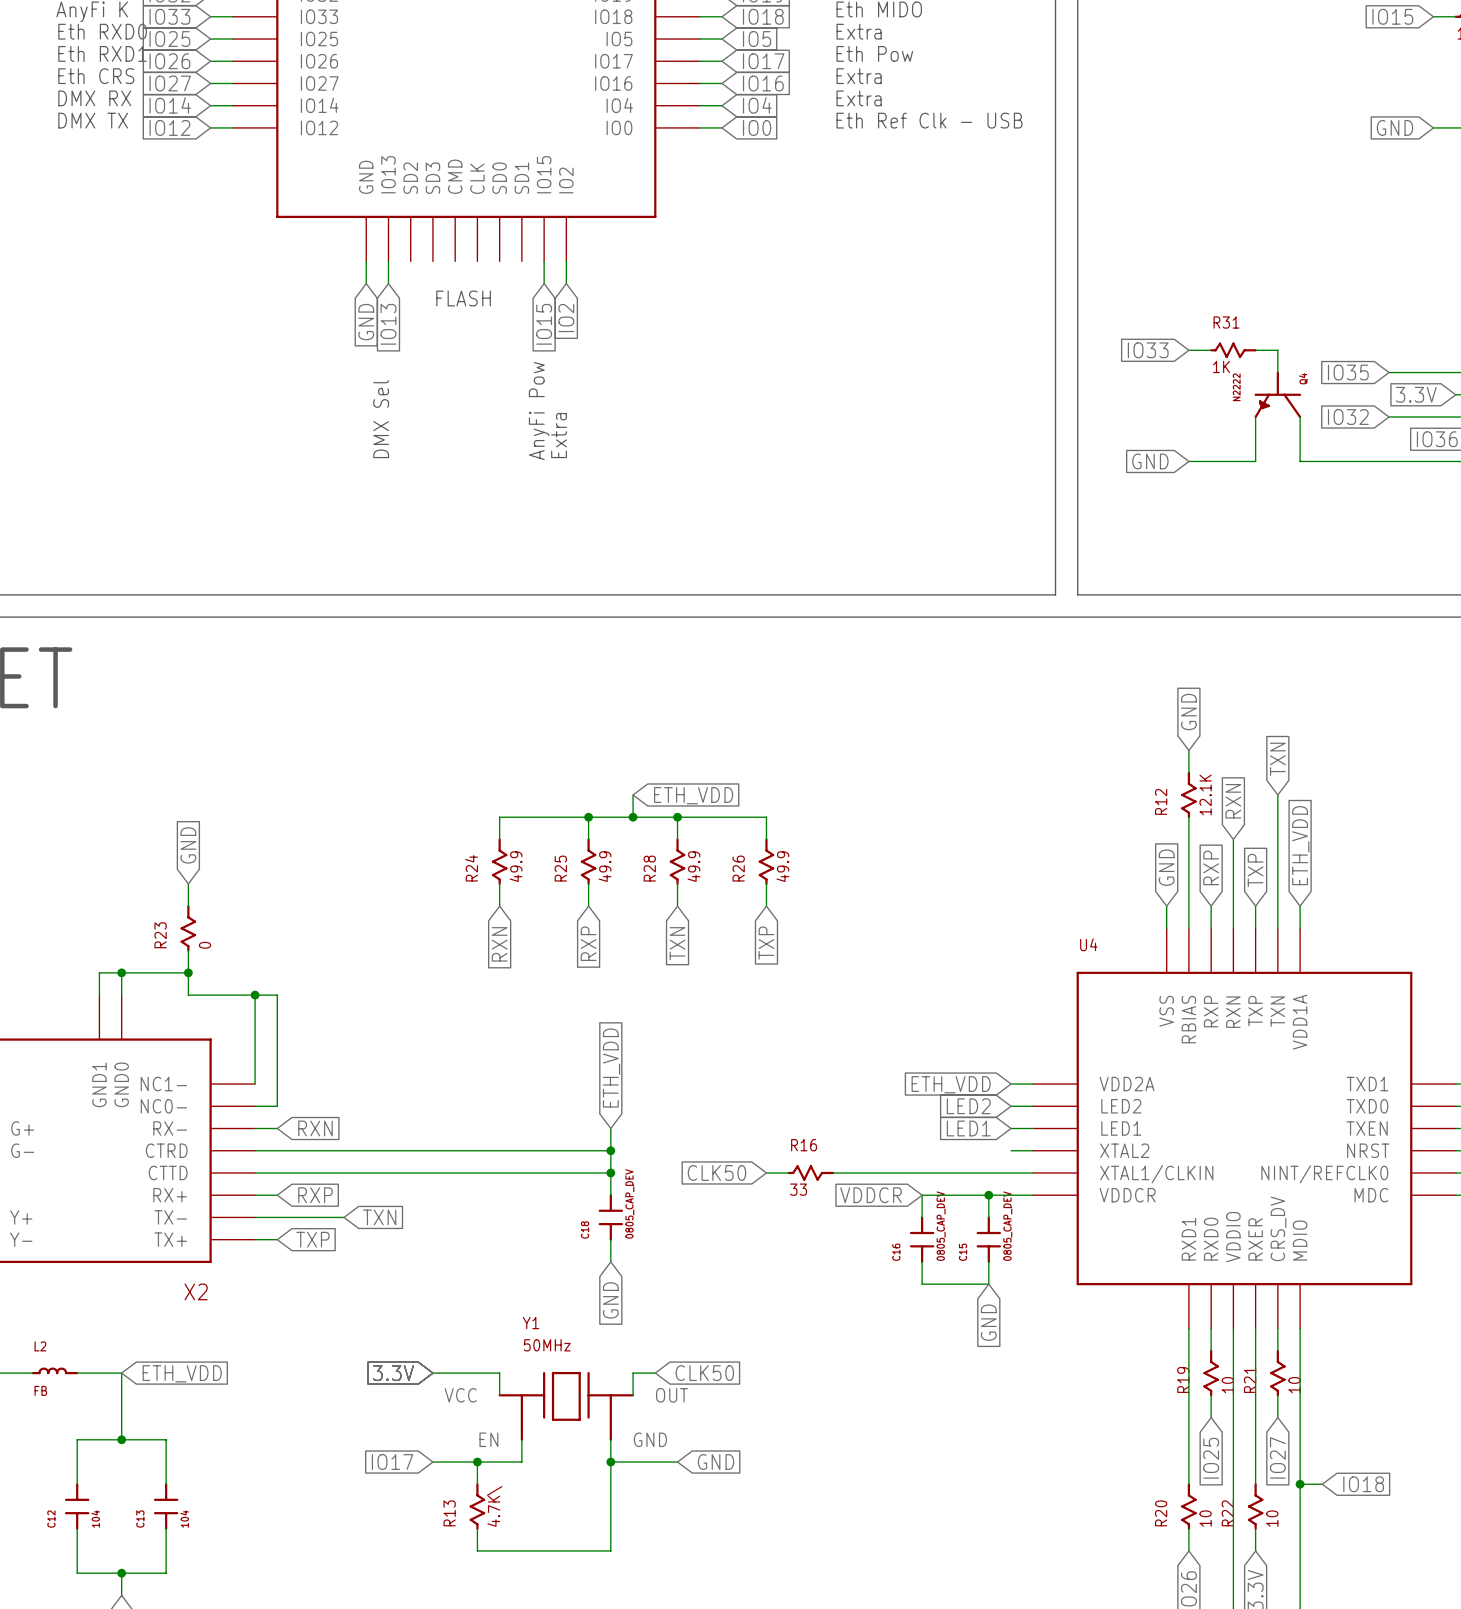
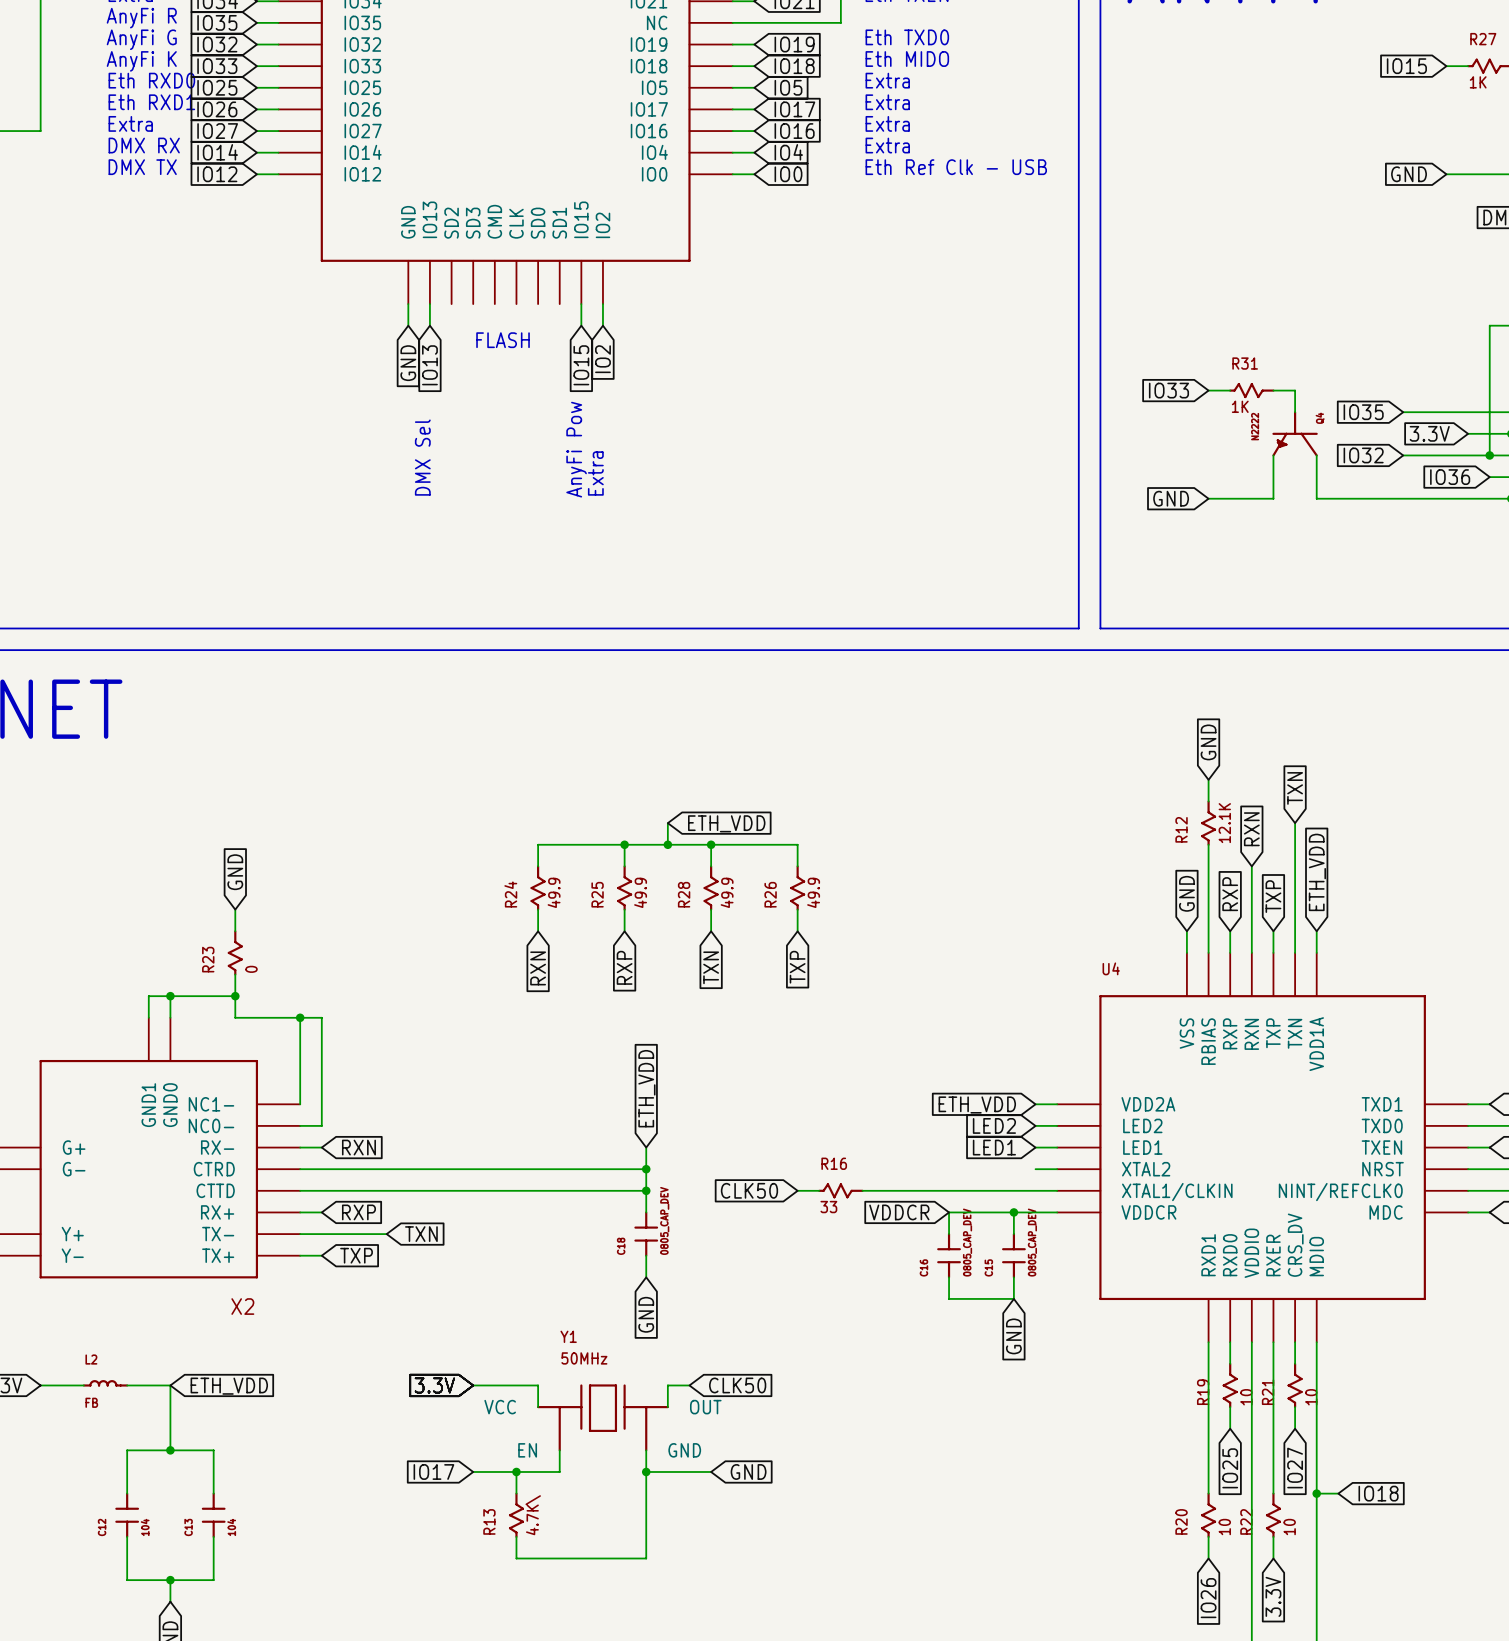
text: Eth Pow (874, 53) -> Extra (887, 102)
text: Eth CRS (96, 76) -> Extra (130, 123)

